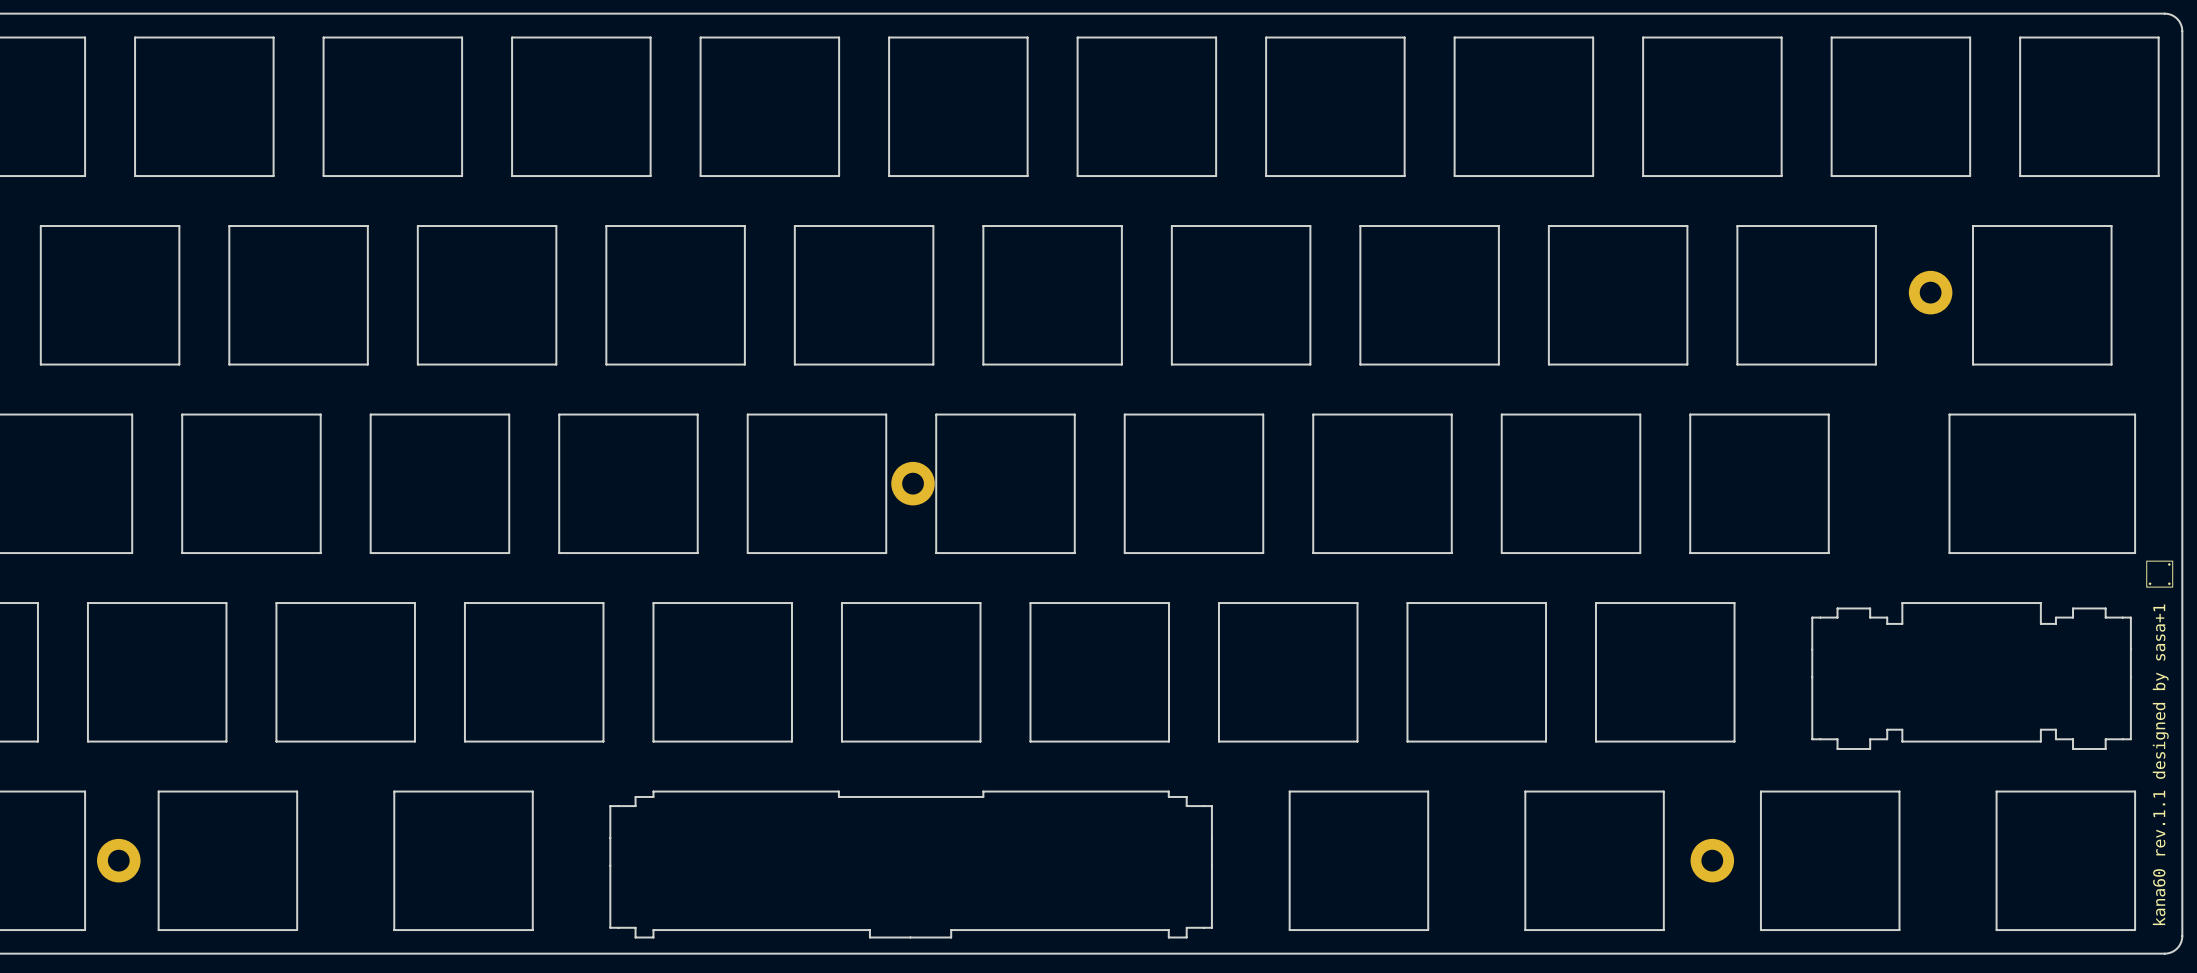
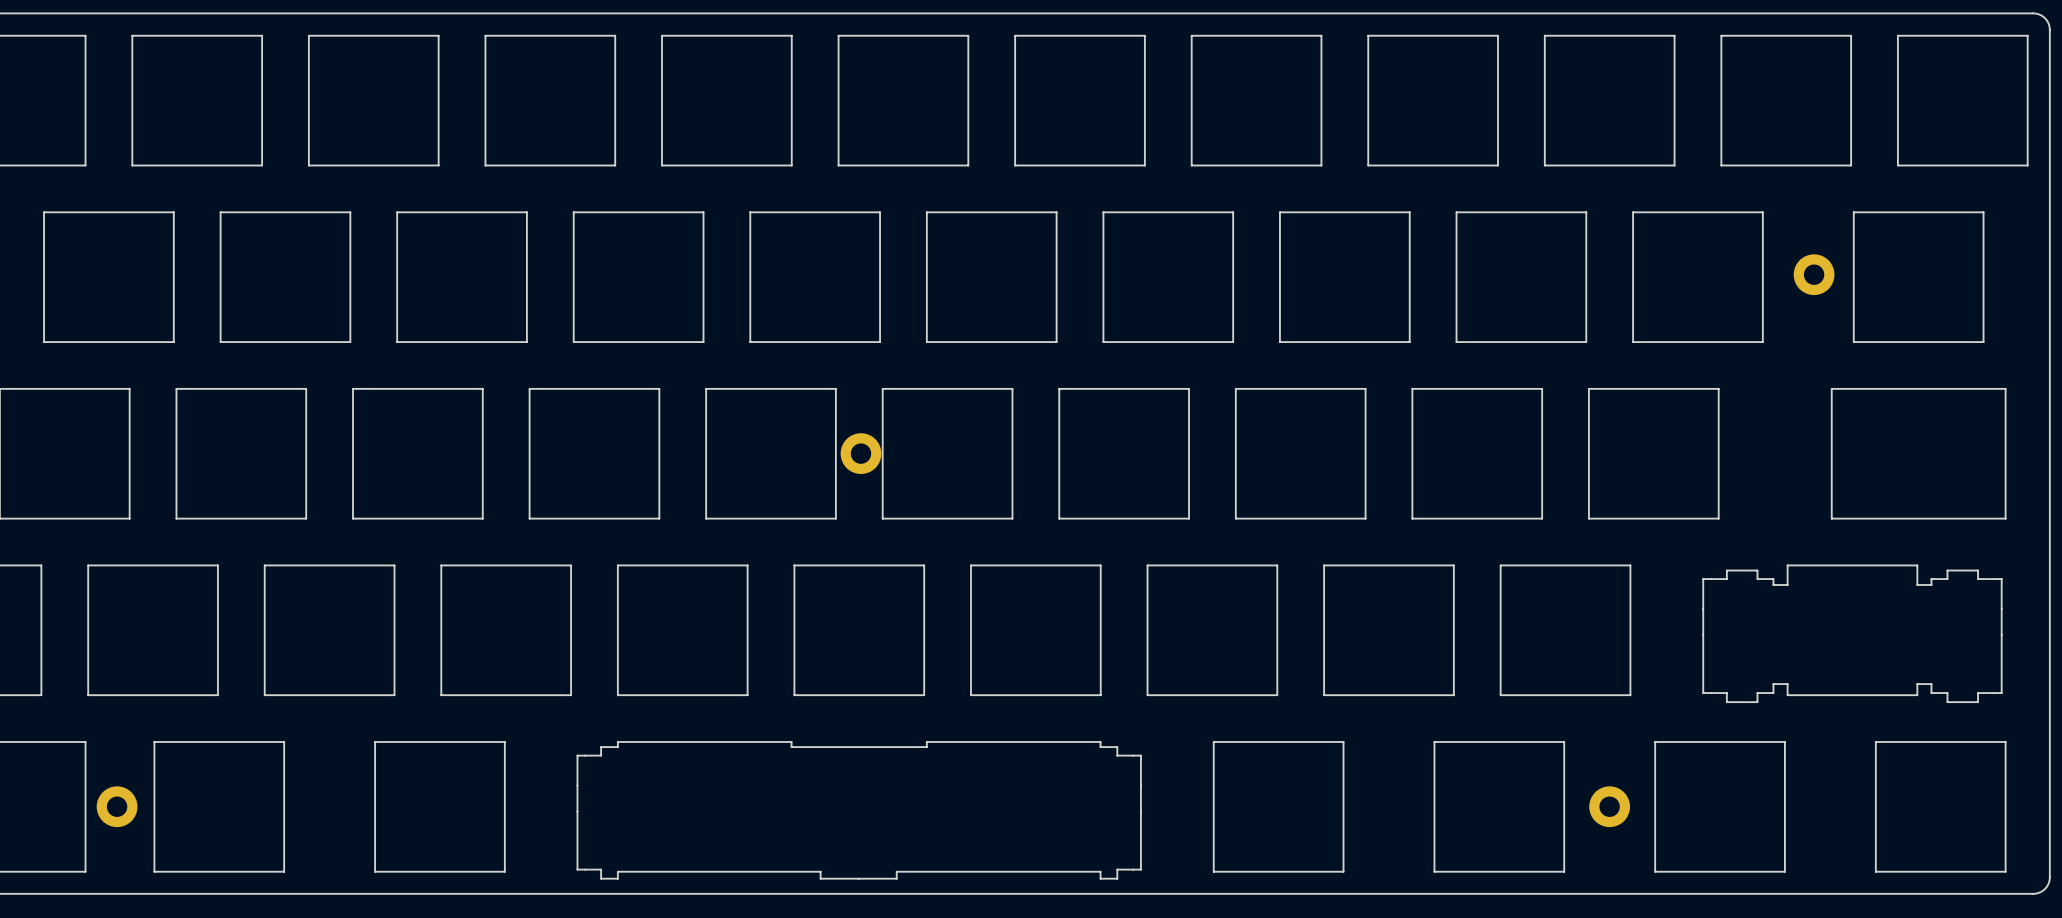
drawing: [2146, 560, 2174, 588] -> none
text: kana60 rev.1.1 designed by sasa+1 (2160, 764) -> none

